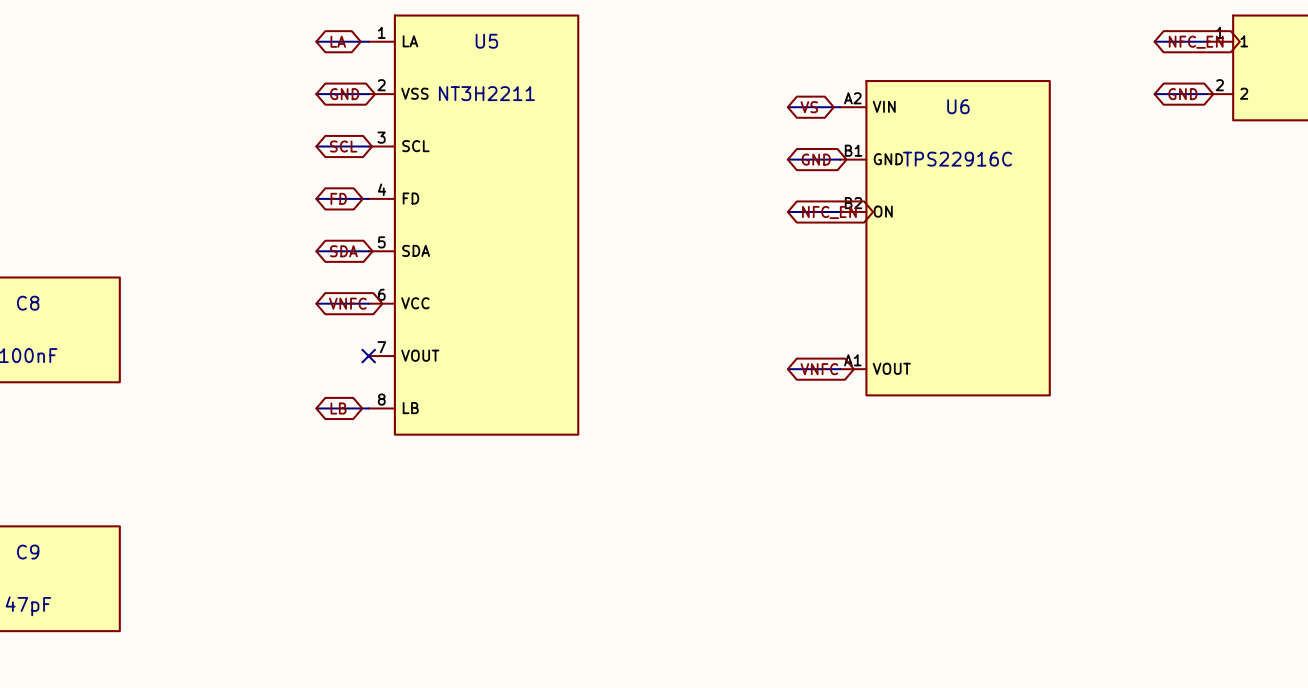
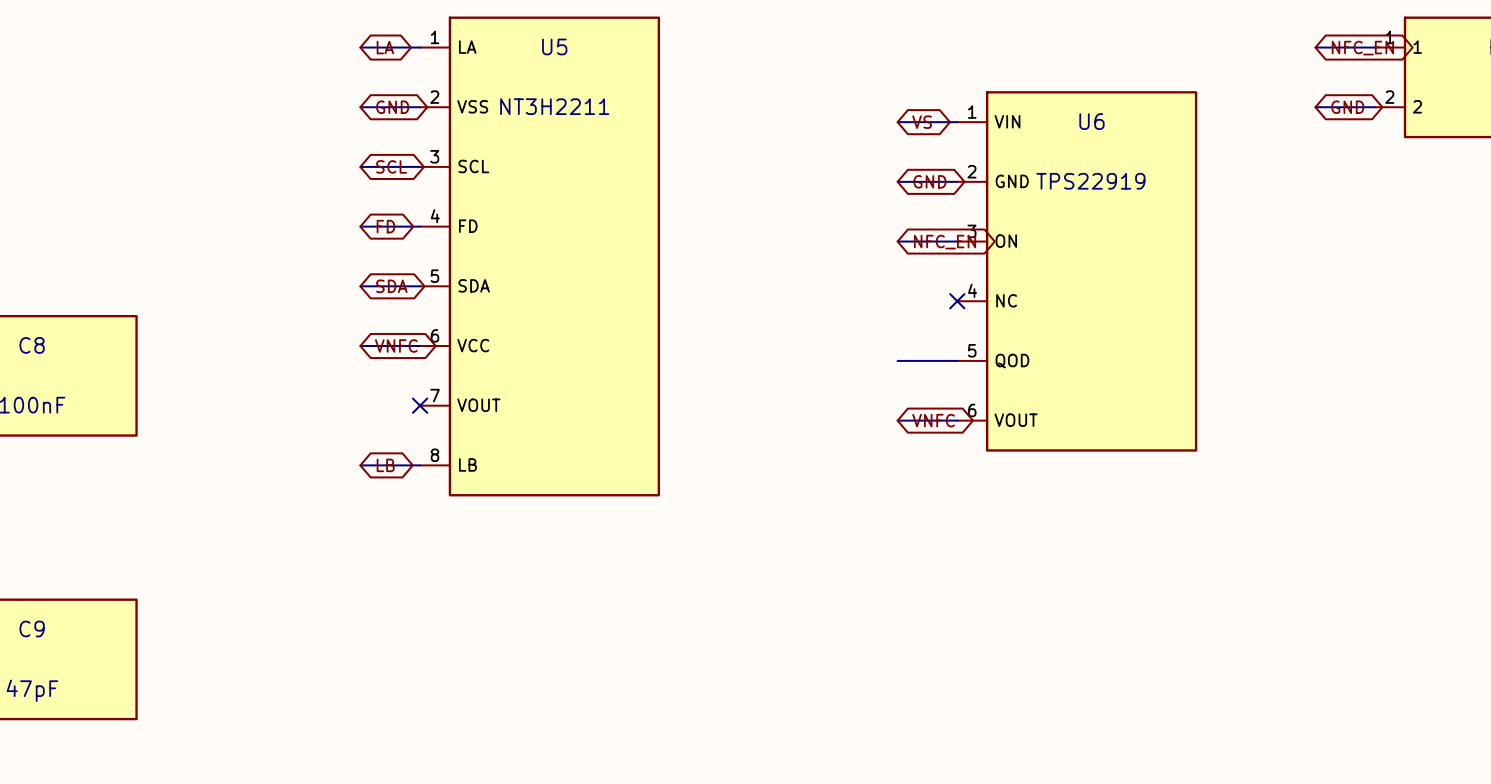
U6 symbol: [840, 79, 1051, 397] -> [957, 91, 1198, 452]
U6 value: TPS22916C (957, 159) -> TPS22919 (1090, 181)
no-connect mark: none -> (957, 301)
wire: none -> (897, 360) (957, 360)

